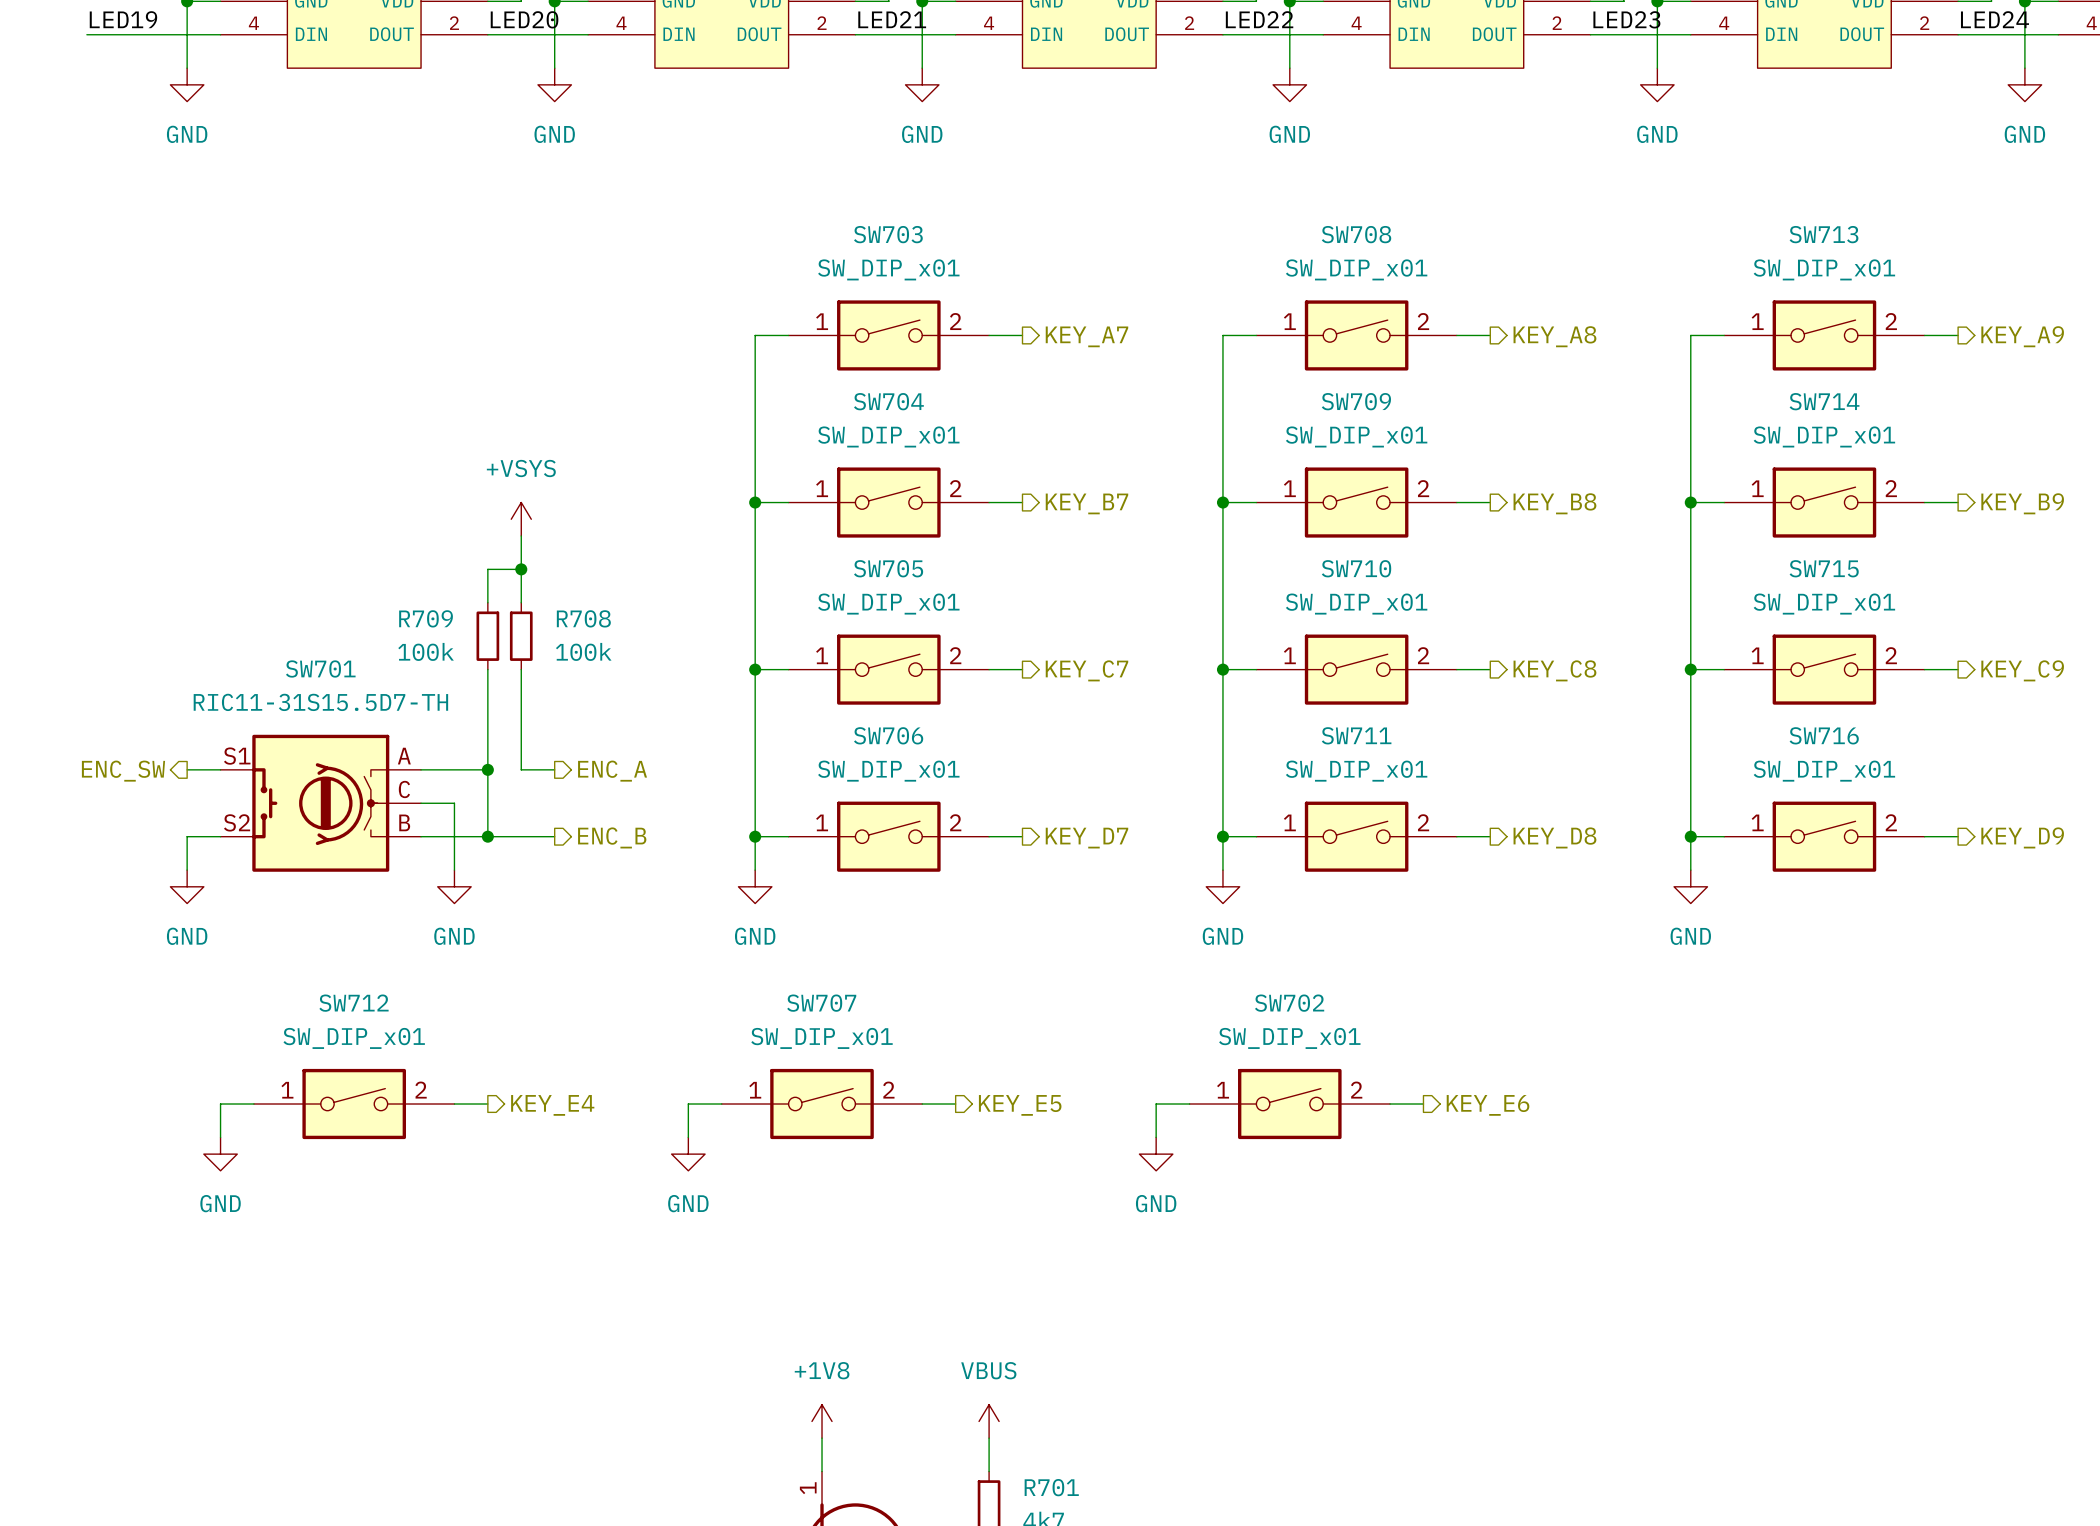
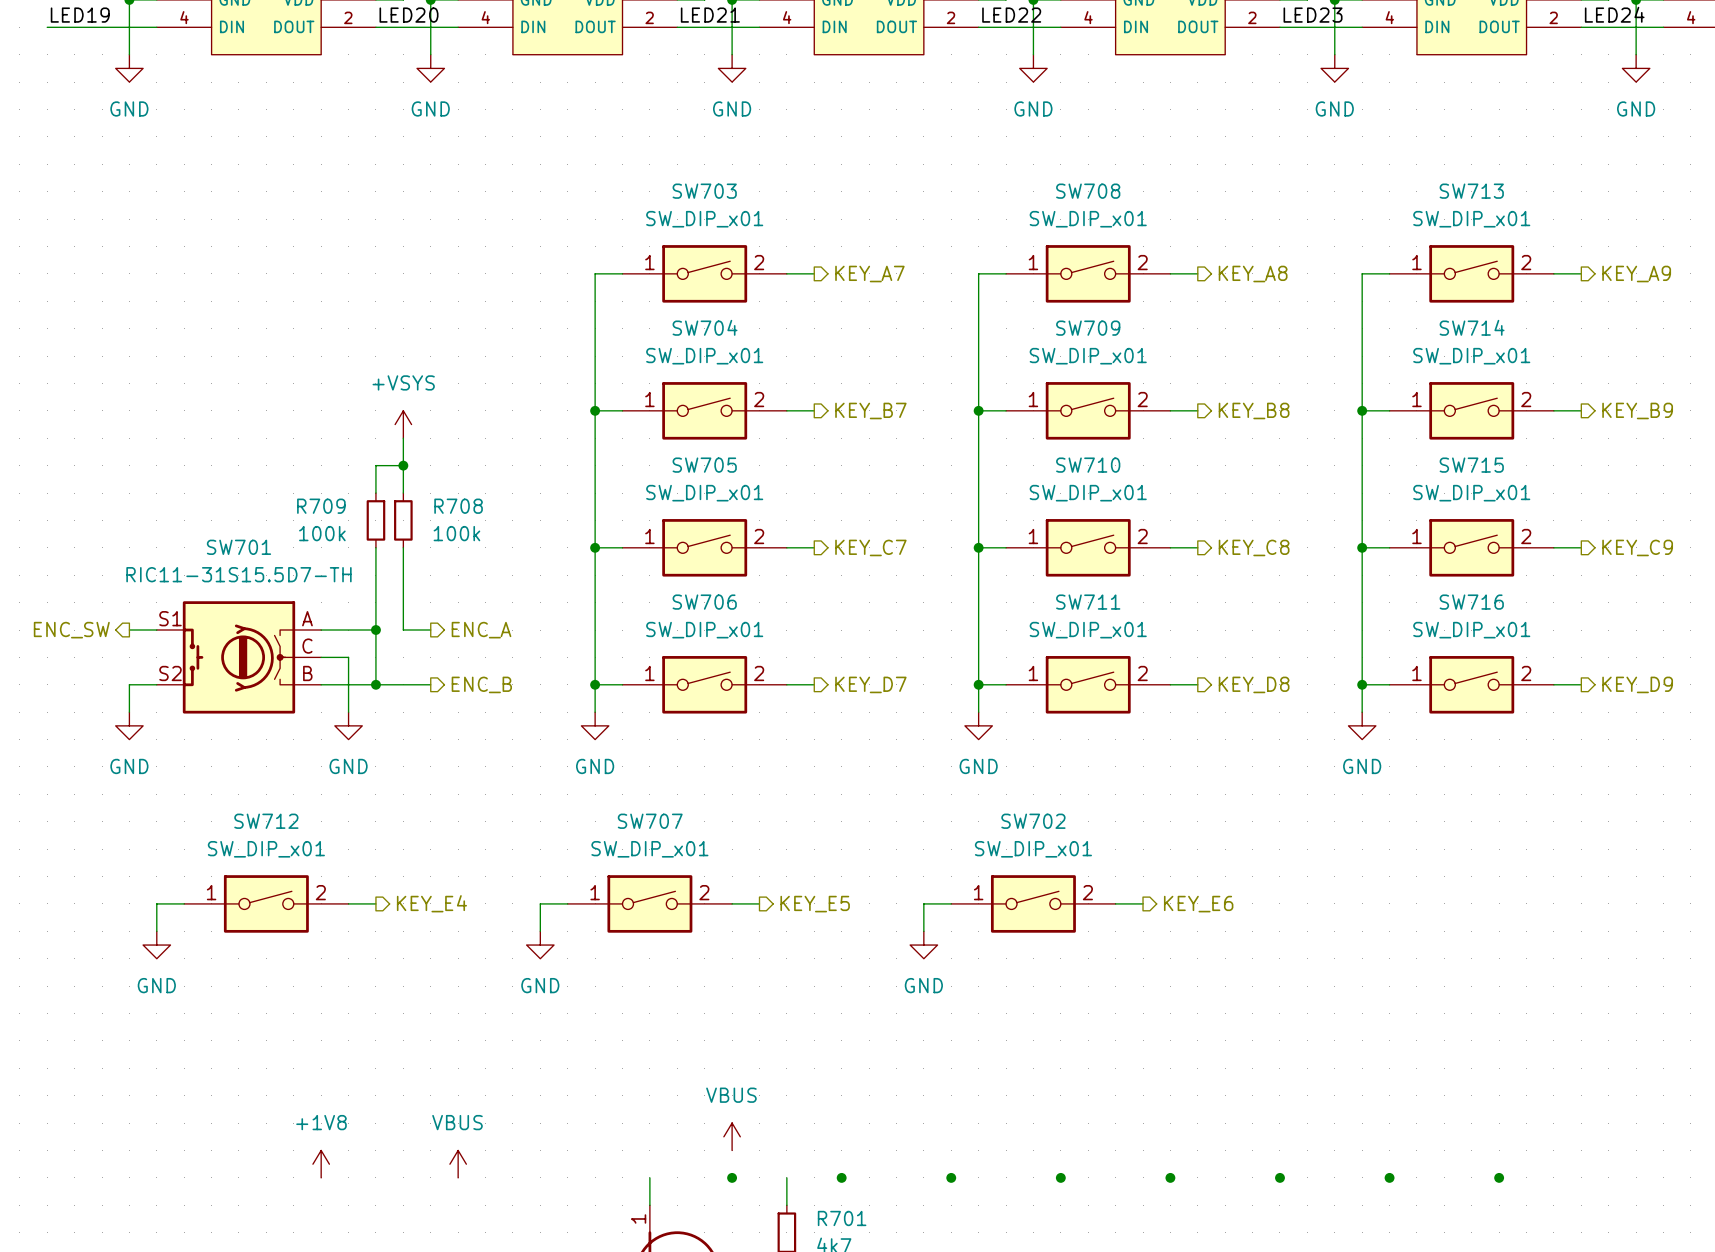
power symbol: none -> +1V8 (321, 1164)
power symbol: none -> VBUS (458, 1164)
power symbol: +1V8 (822, 1421) -> none
power symbol position: VBUS (989, 1421) -> VBUS (732, 1136)
junction: none -> (732, 1177)
junction: none -> (841, 1177)
junction: none -> (951, 1177)
junction: none -> (1060, 1177)
junction: none -> (1170, 1177)
junction: none -> (1279, 1177)
junction: none -> (1389, 1177)
junction: none -> (1499, 1177)

